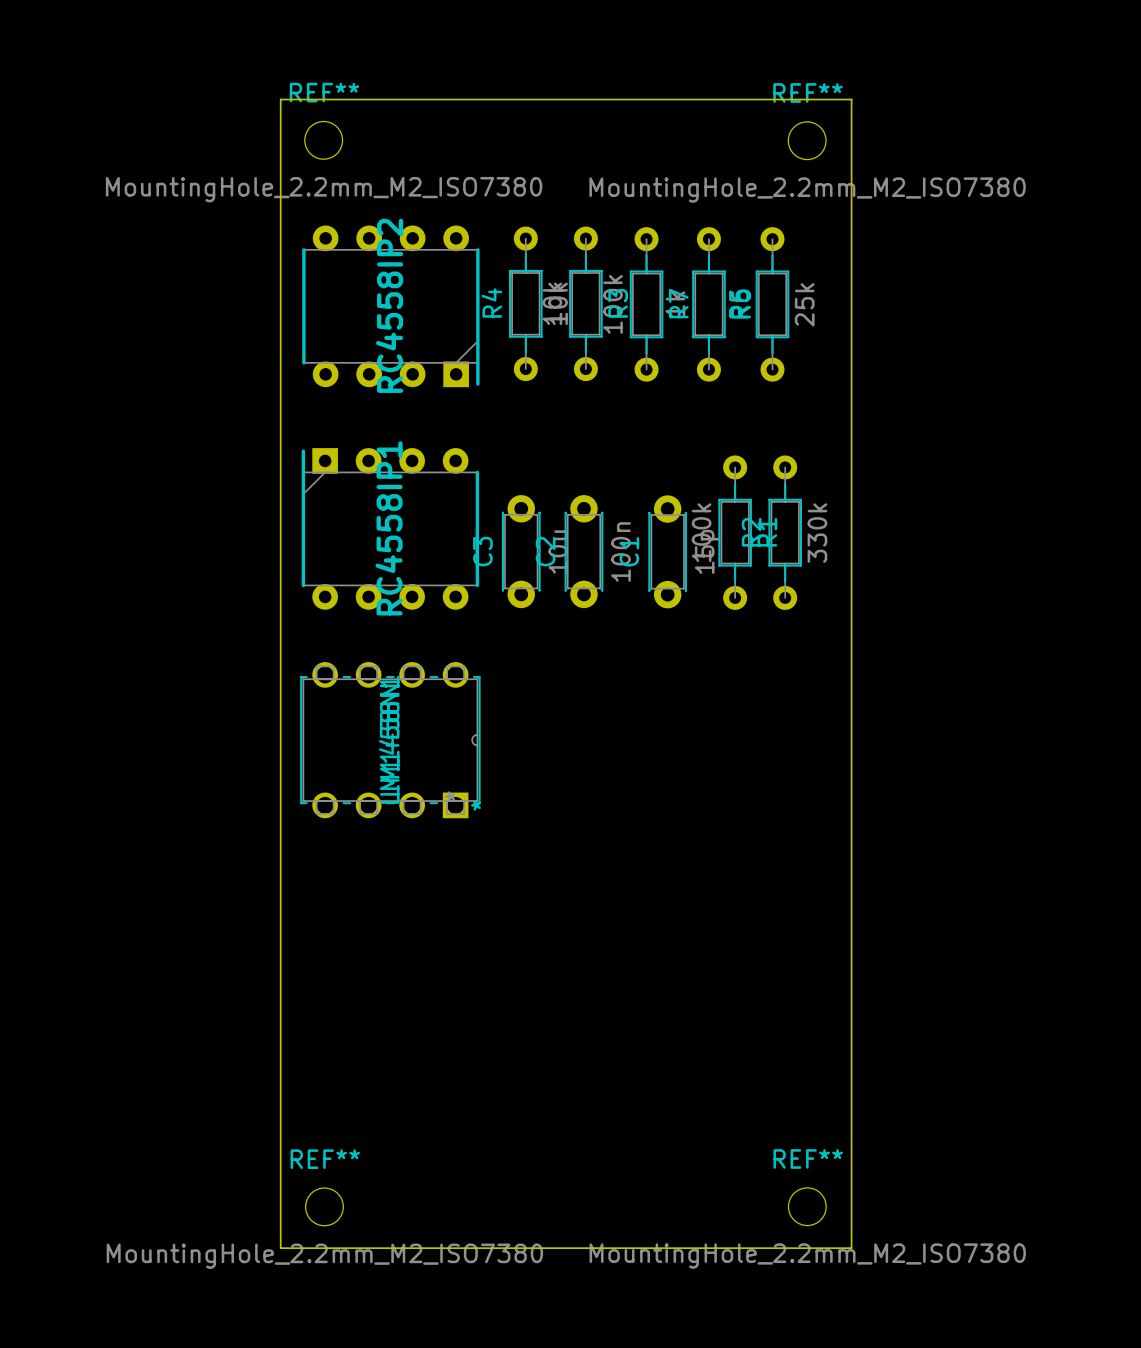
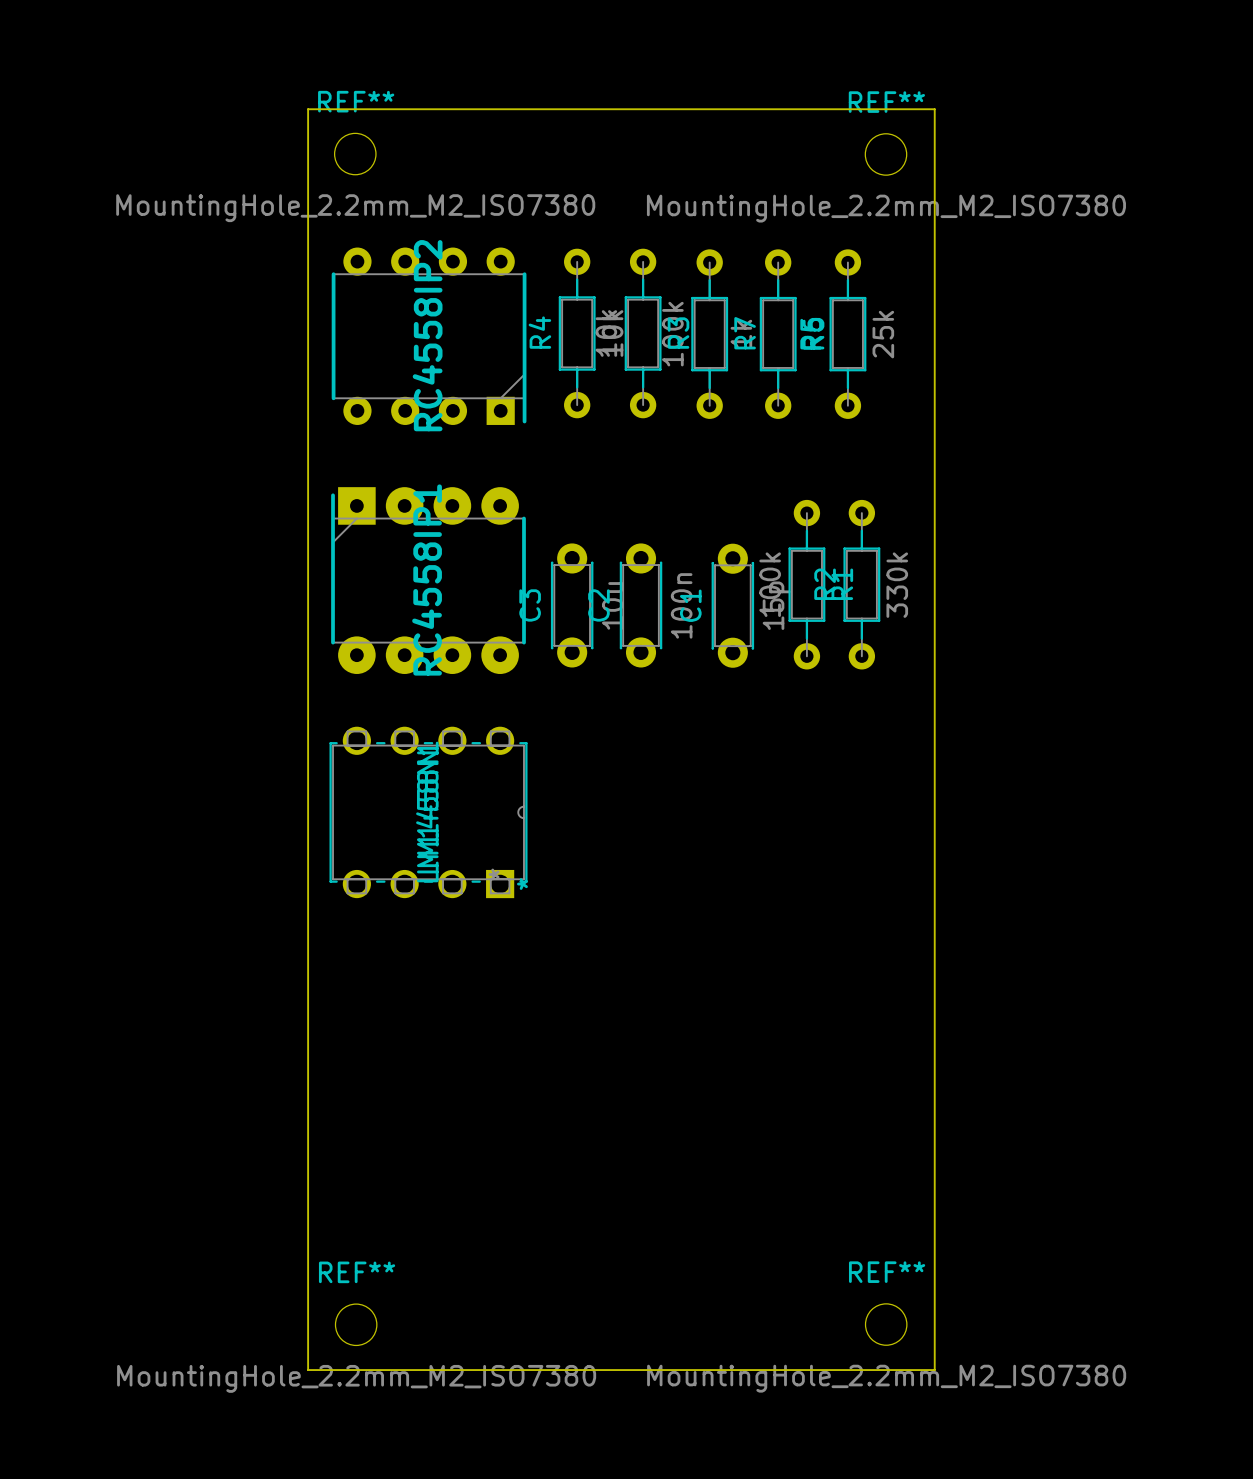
RC4558IP1 footprint: [301, 448, 480, 610] -> [331, 487, 526, 674]

